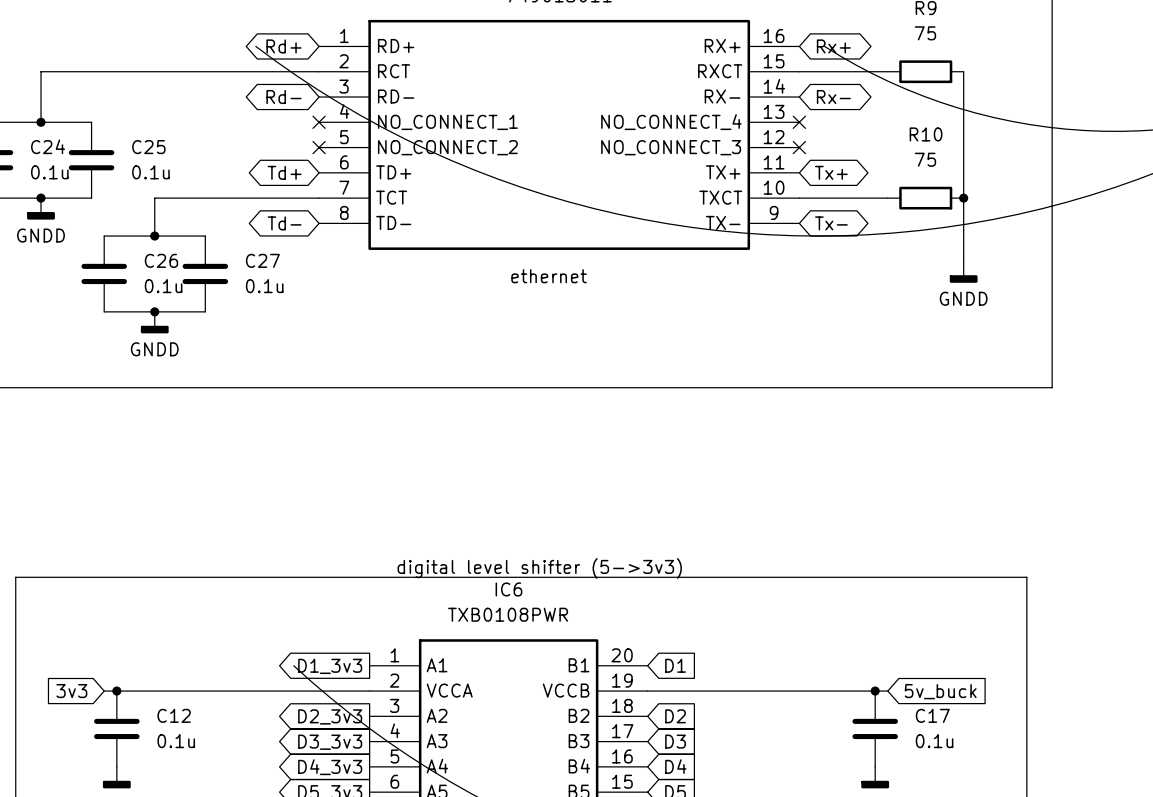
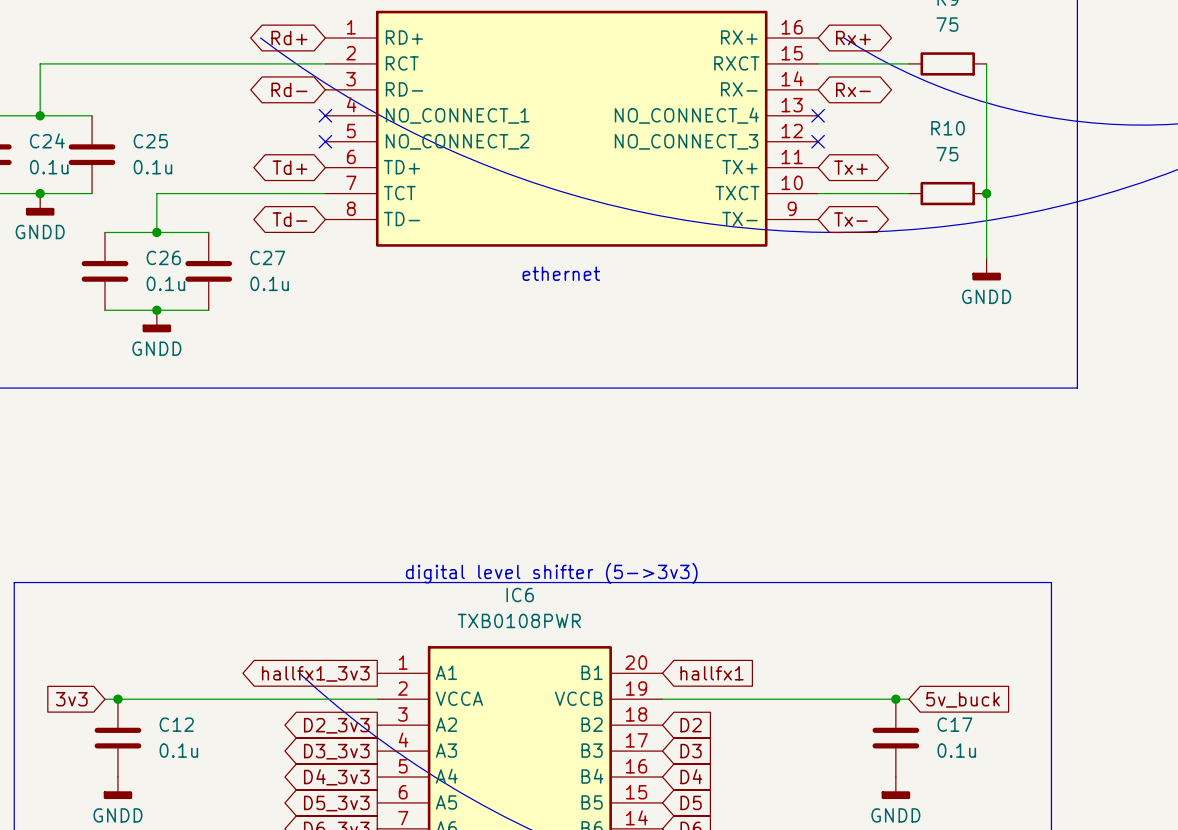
global label: D1 (675, 665) -> hallfx1 (712, 673)
global label: D1_3v3 (330, 666) -> hallfx1_3v3 (315, 673)

